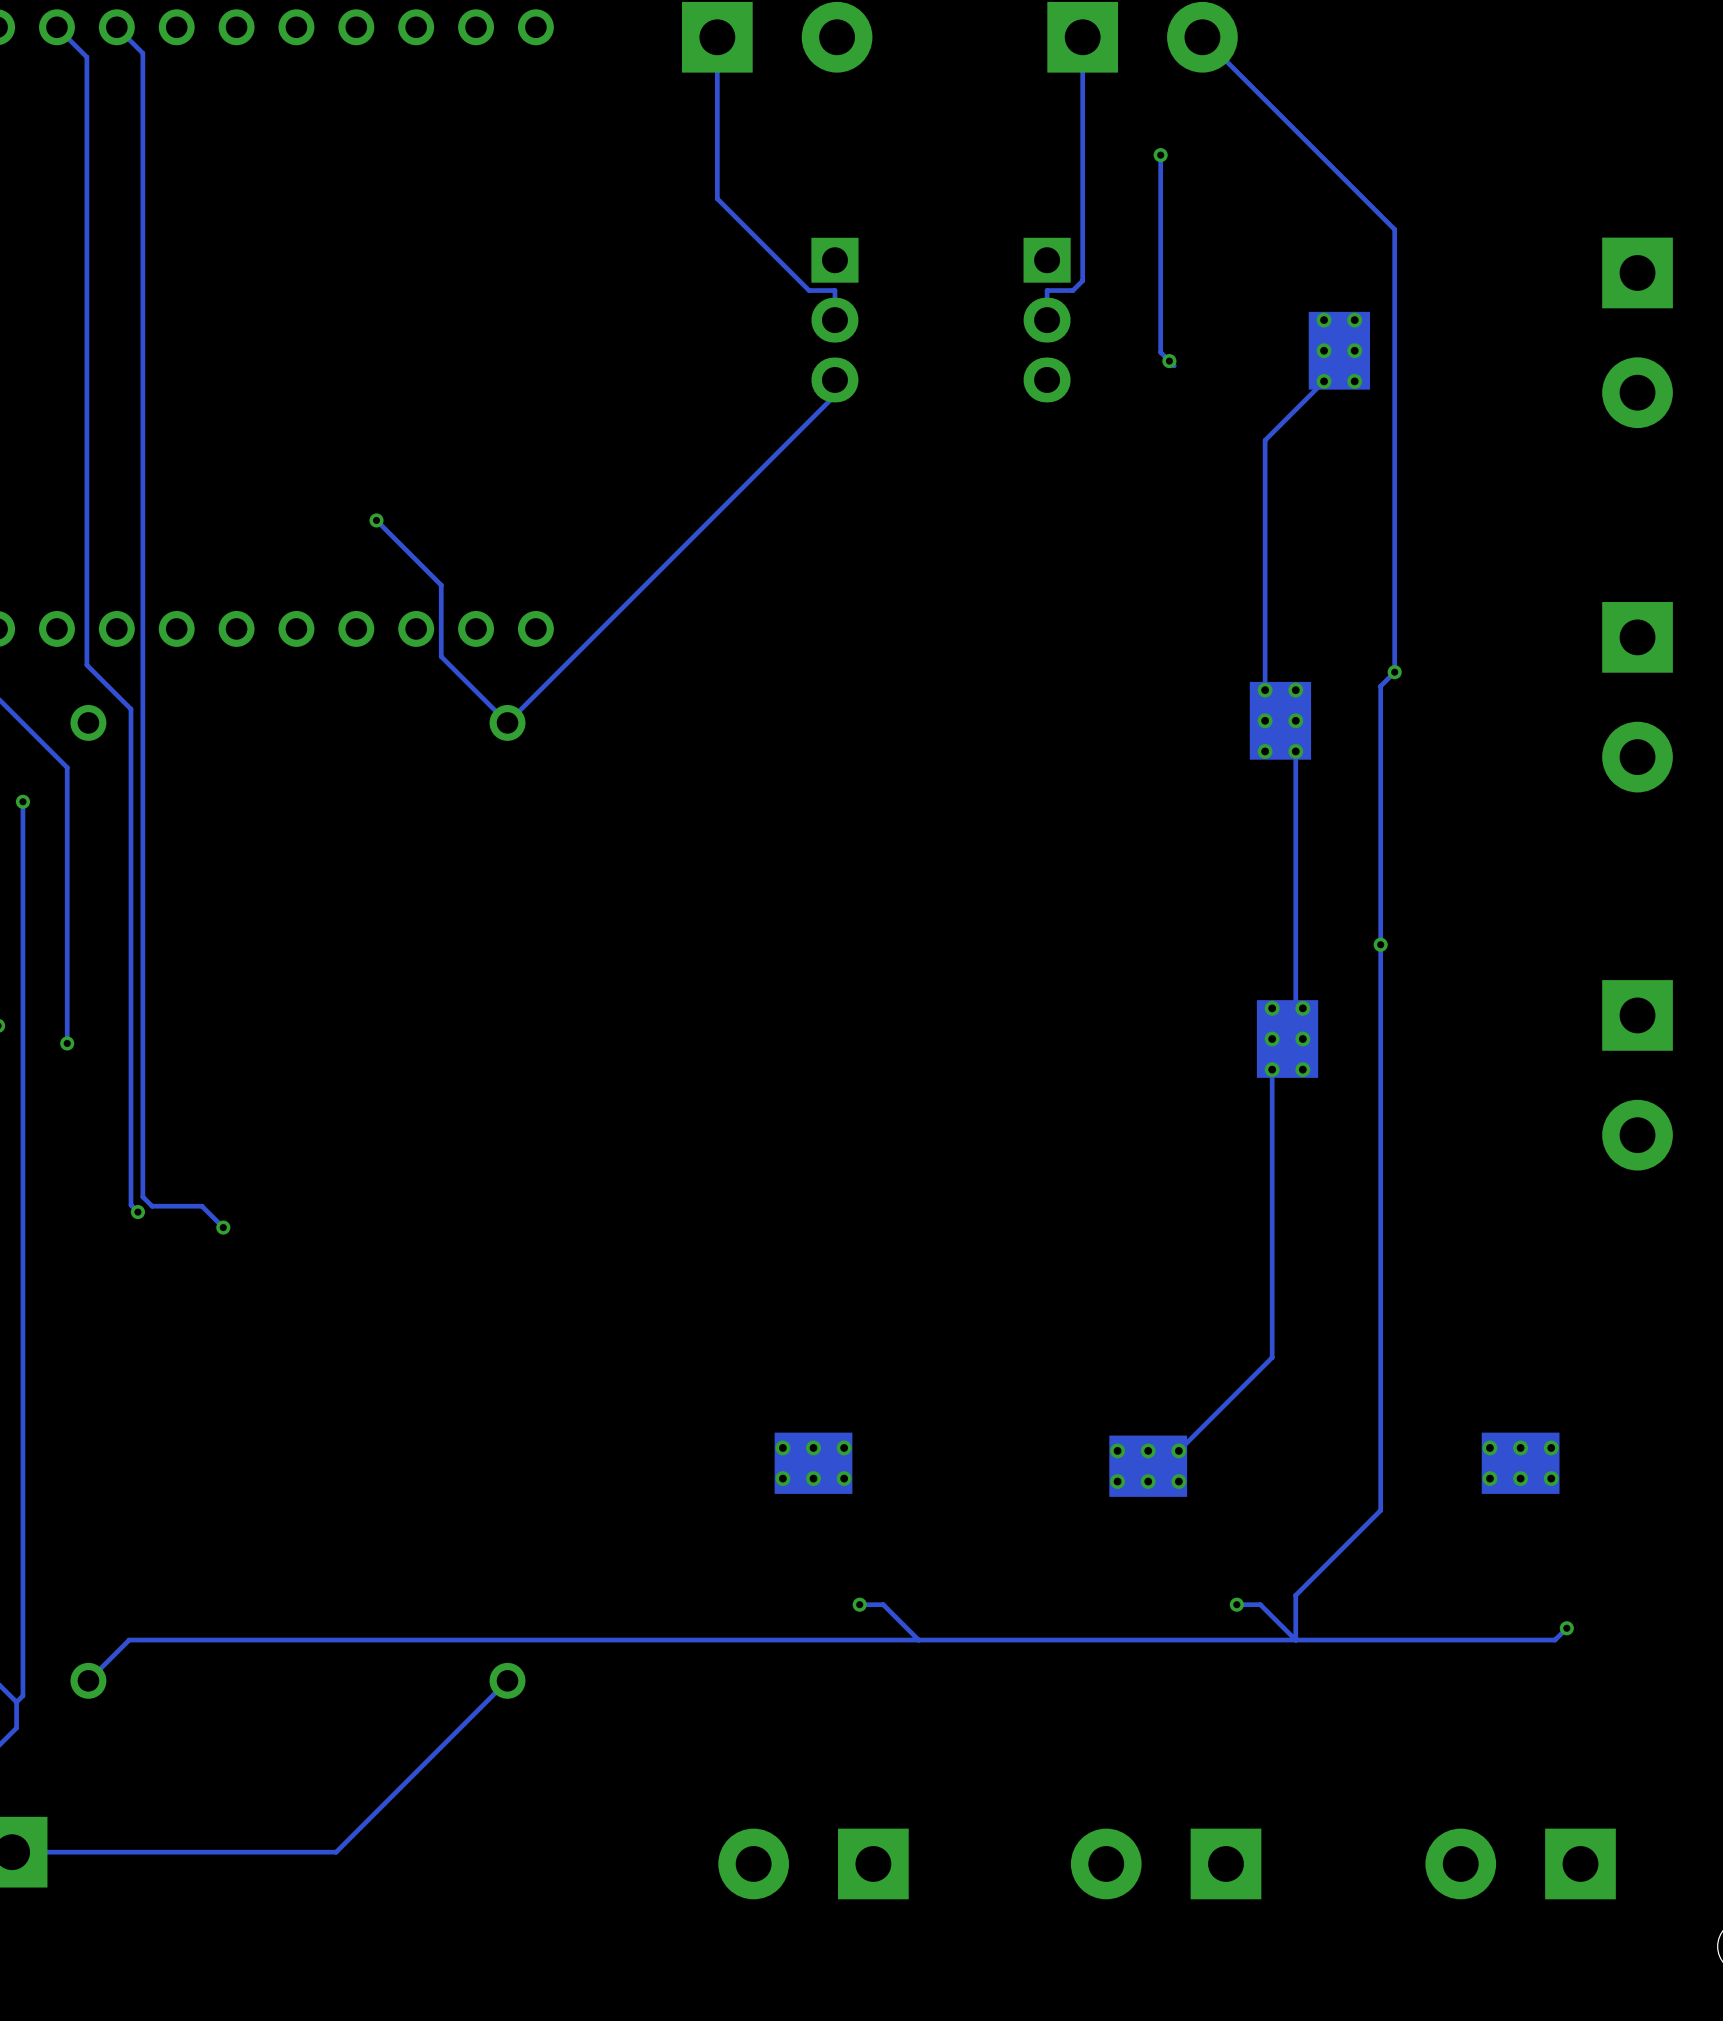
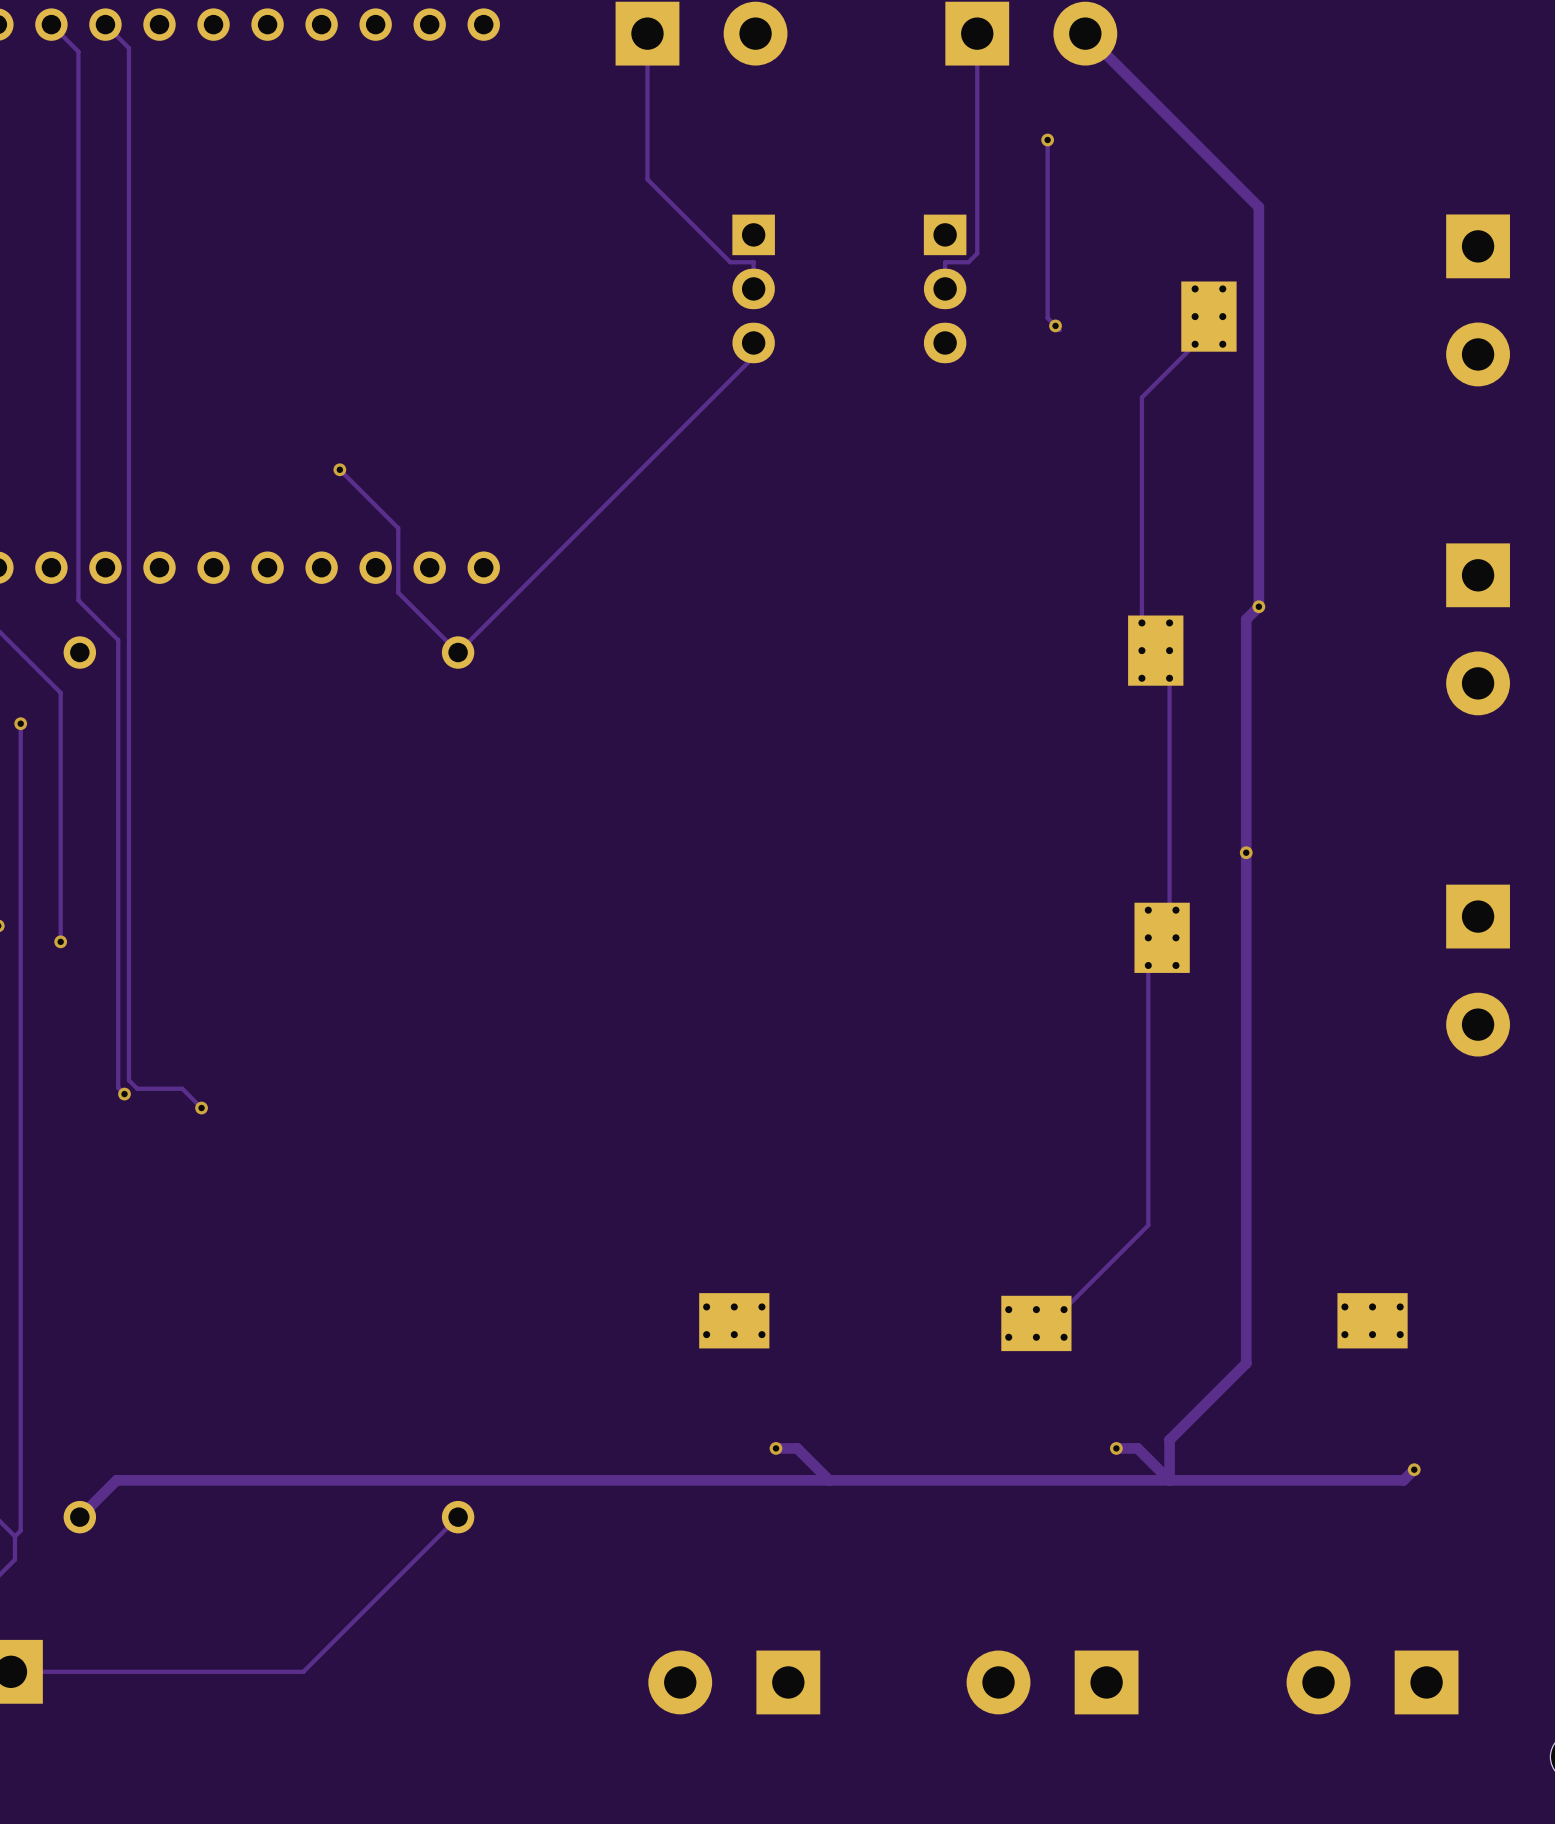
track width: thin (1202, 37) (1394, 229) (1394, 672) (1380, 686) (1380, 1510) (1295, 1595) (1295, 1640) (1260, 1604) (1236, 1604) -> thick (1085, 33) (1258, 207) (1258, 606) (1246, 619) (1246, 1363) (1169, 1439) (1169, 1480) (1137, 1448) (1116, 1448)
track width: thin (859, 1604) (883, 1604) (918, 1640) -> thick (775, 1448) (797, 1448) (829, 1480)
track width: thin (1566, 1628) (1555, 1640) (129, 1640) (88, 1680) -> thick (1414, 1469) (1403, 1480) (116, 1480) (79, 1517)

